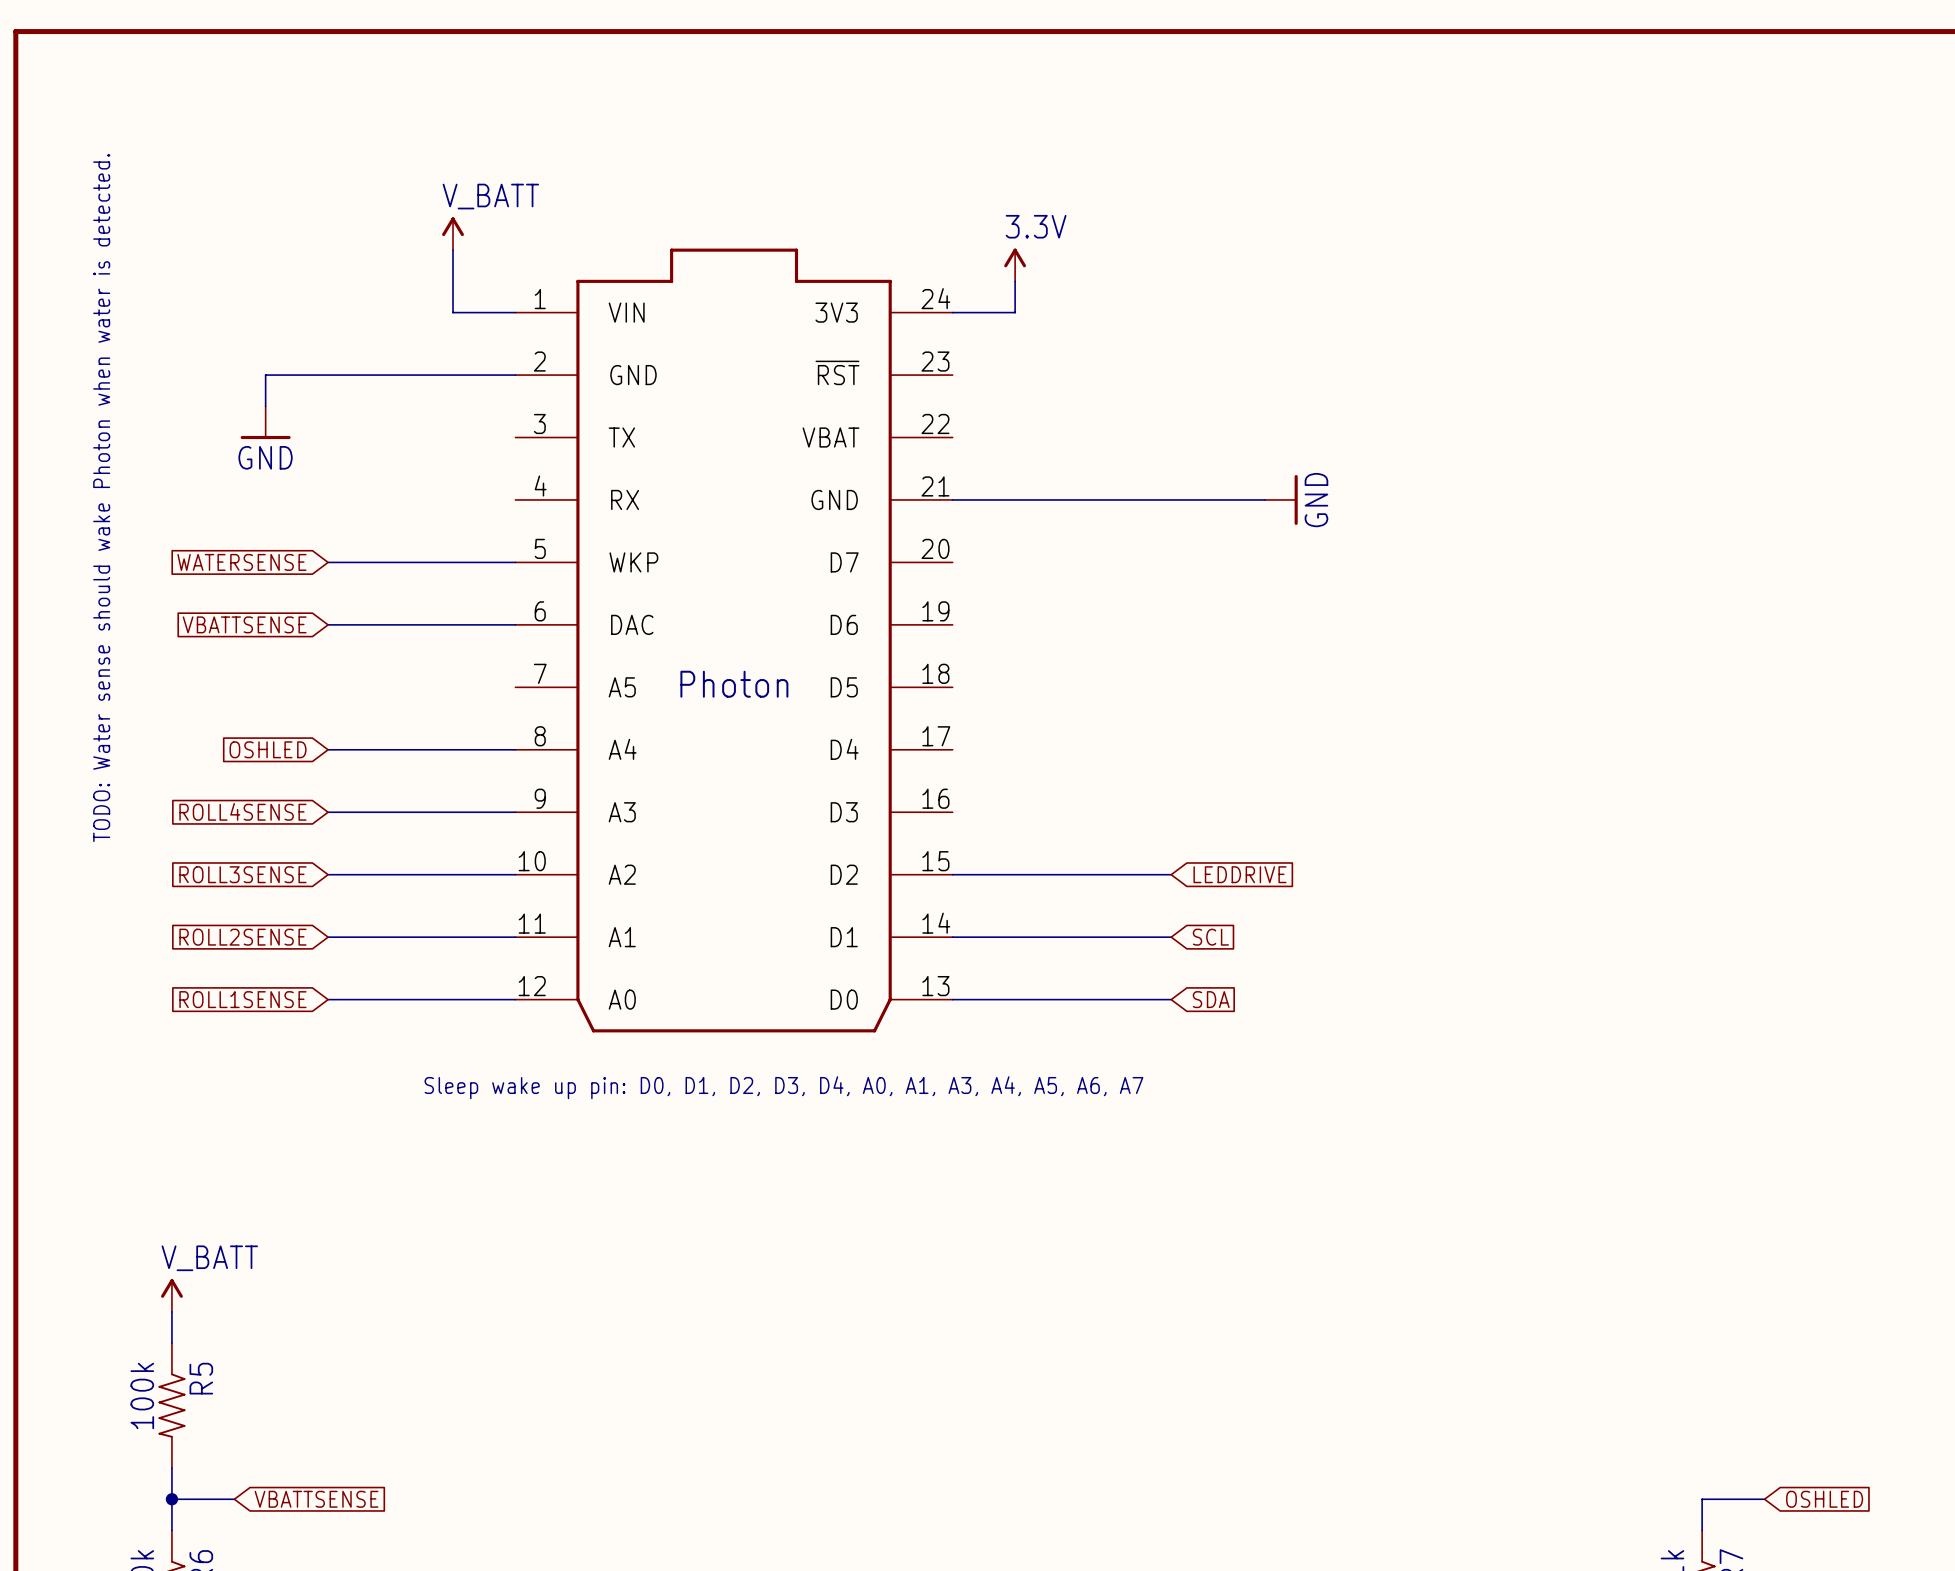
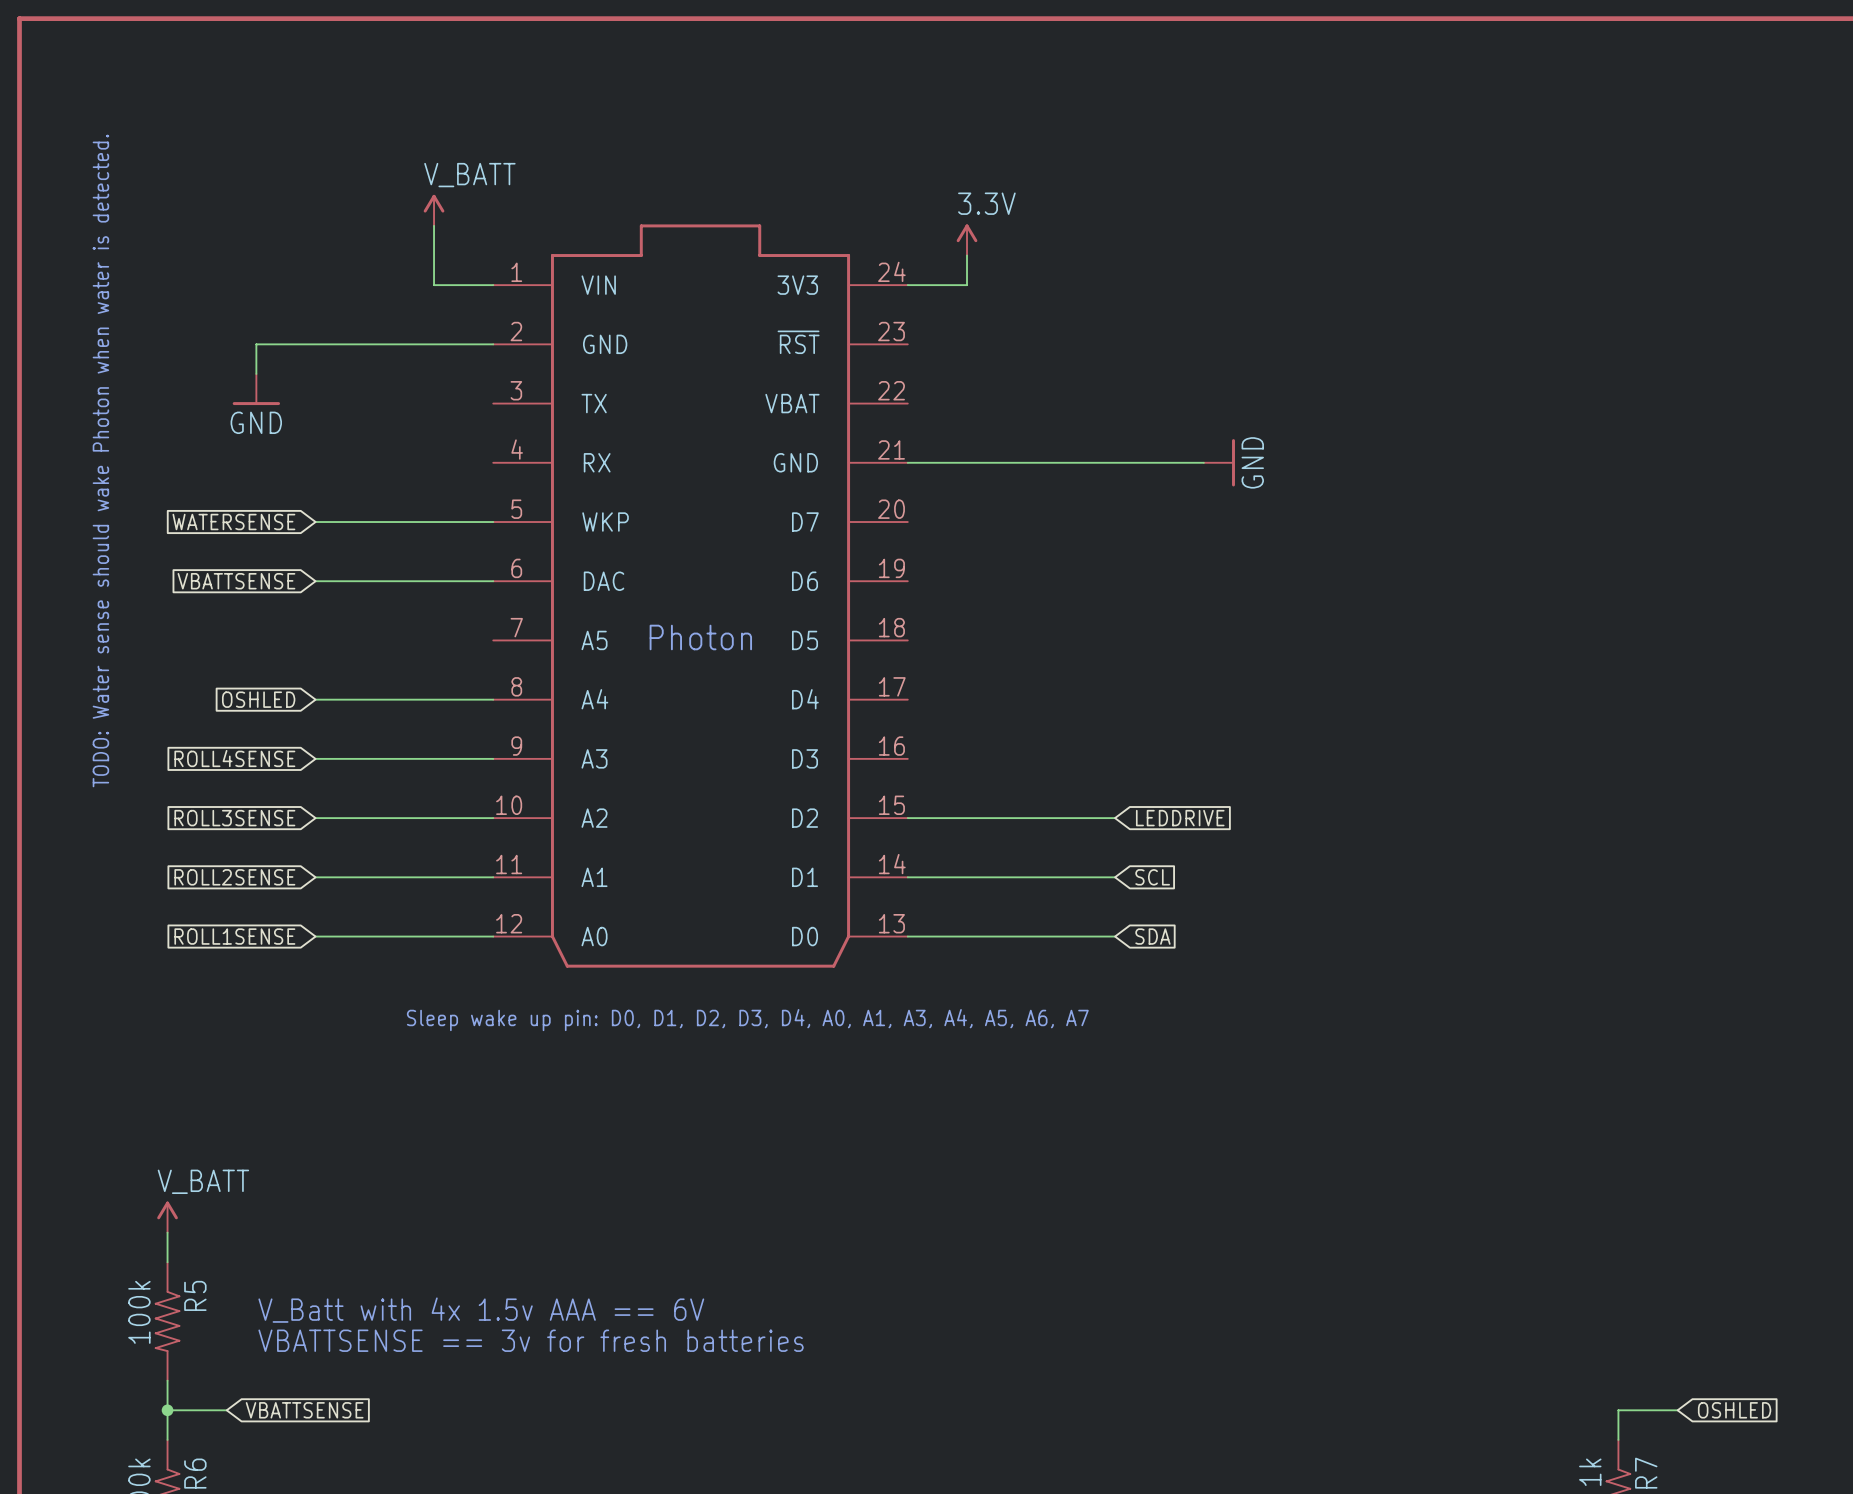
text: none -> V_Batt with 4x 1.5v AAA == 6V (481, 1310)
text: none -> VBATTSENSE == 3v for fresh batteries (531, 1340)

